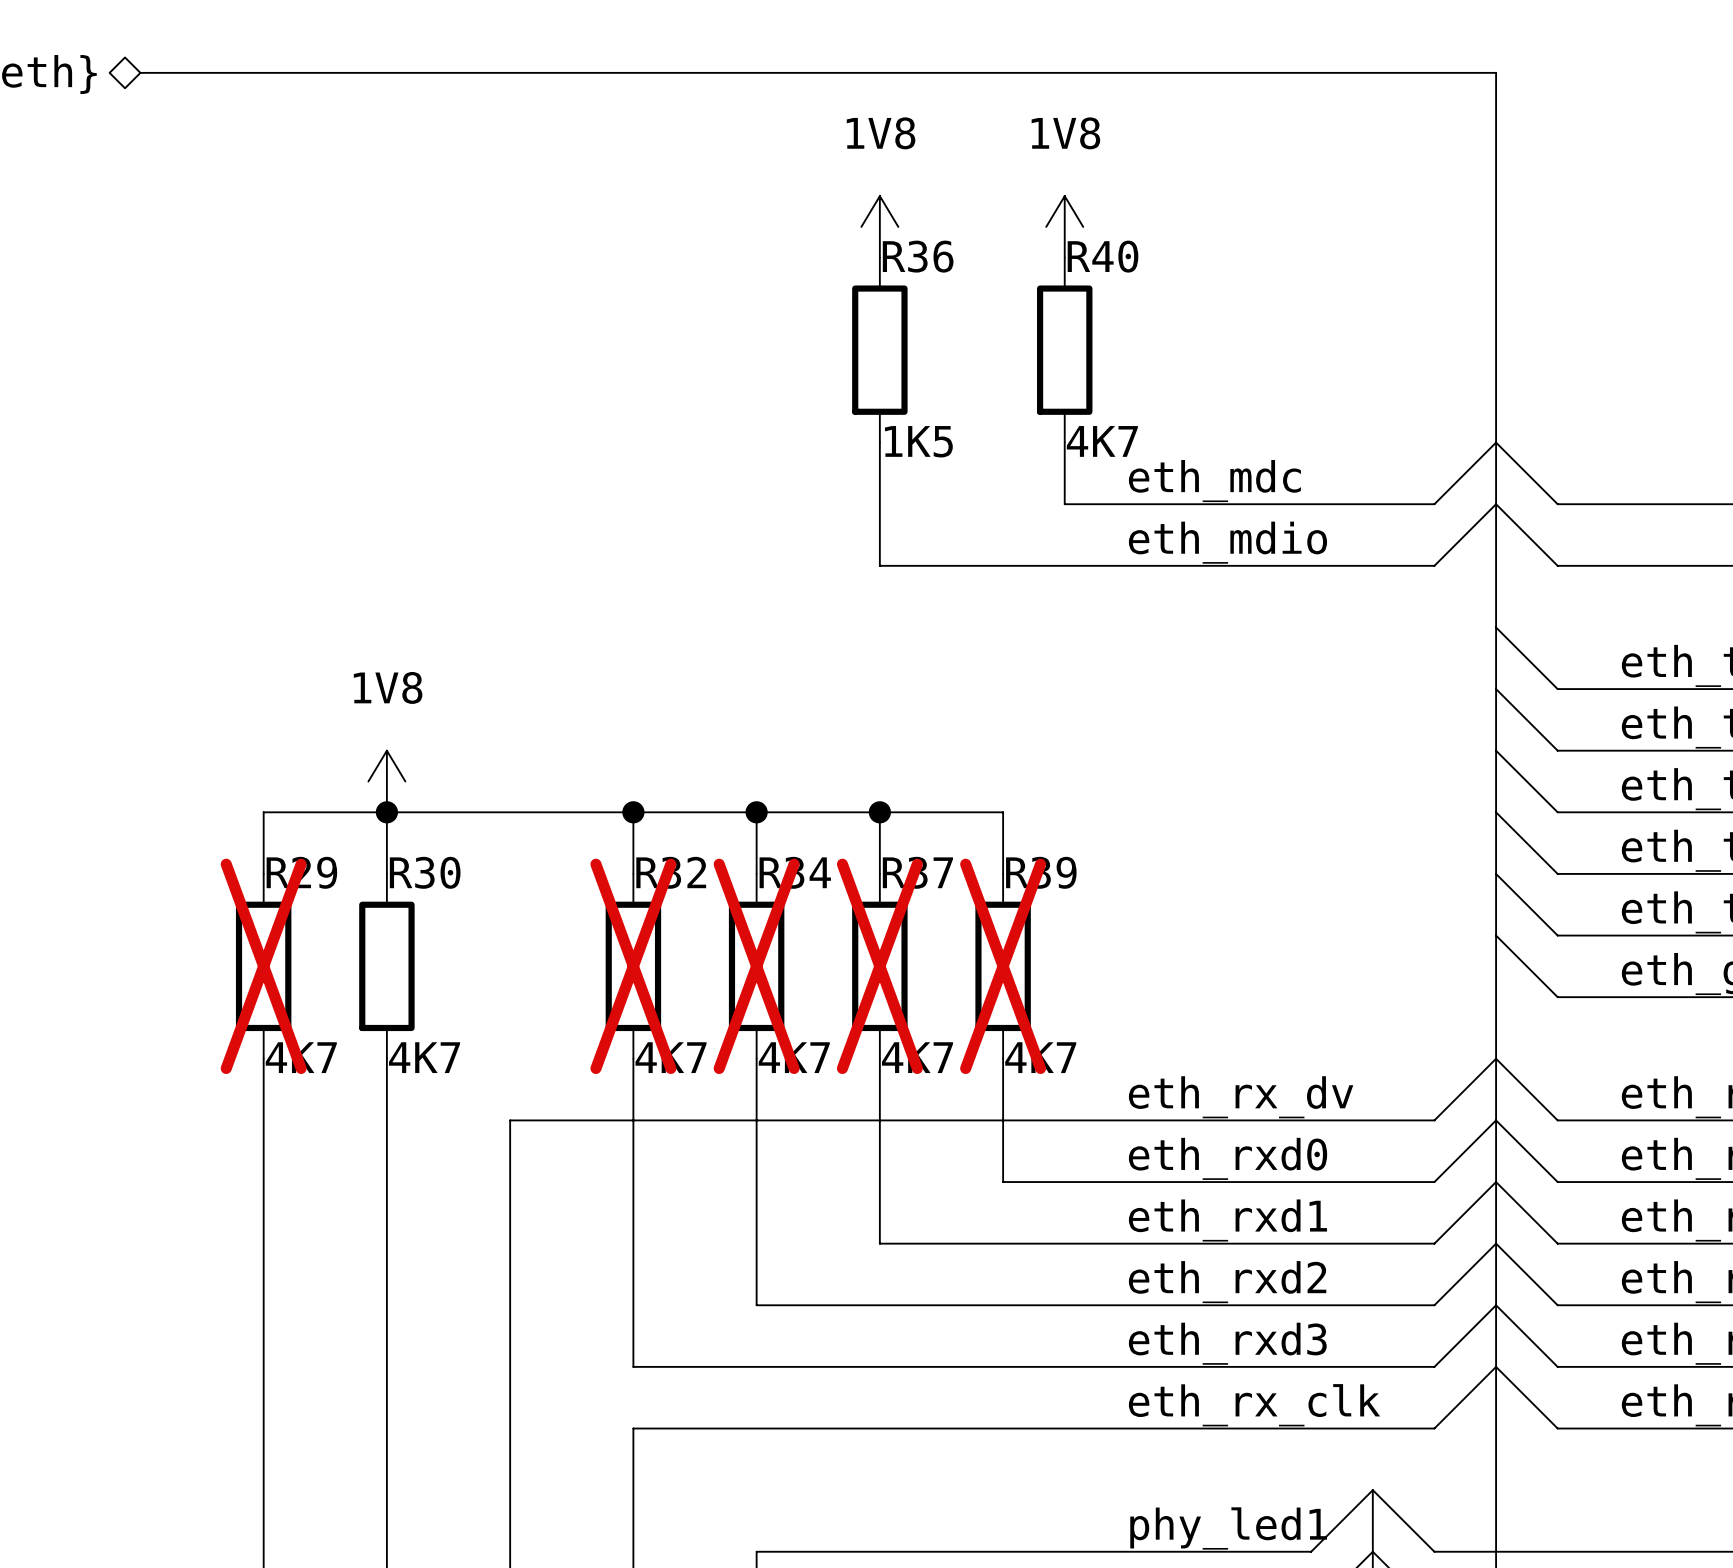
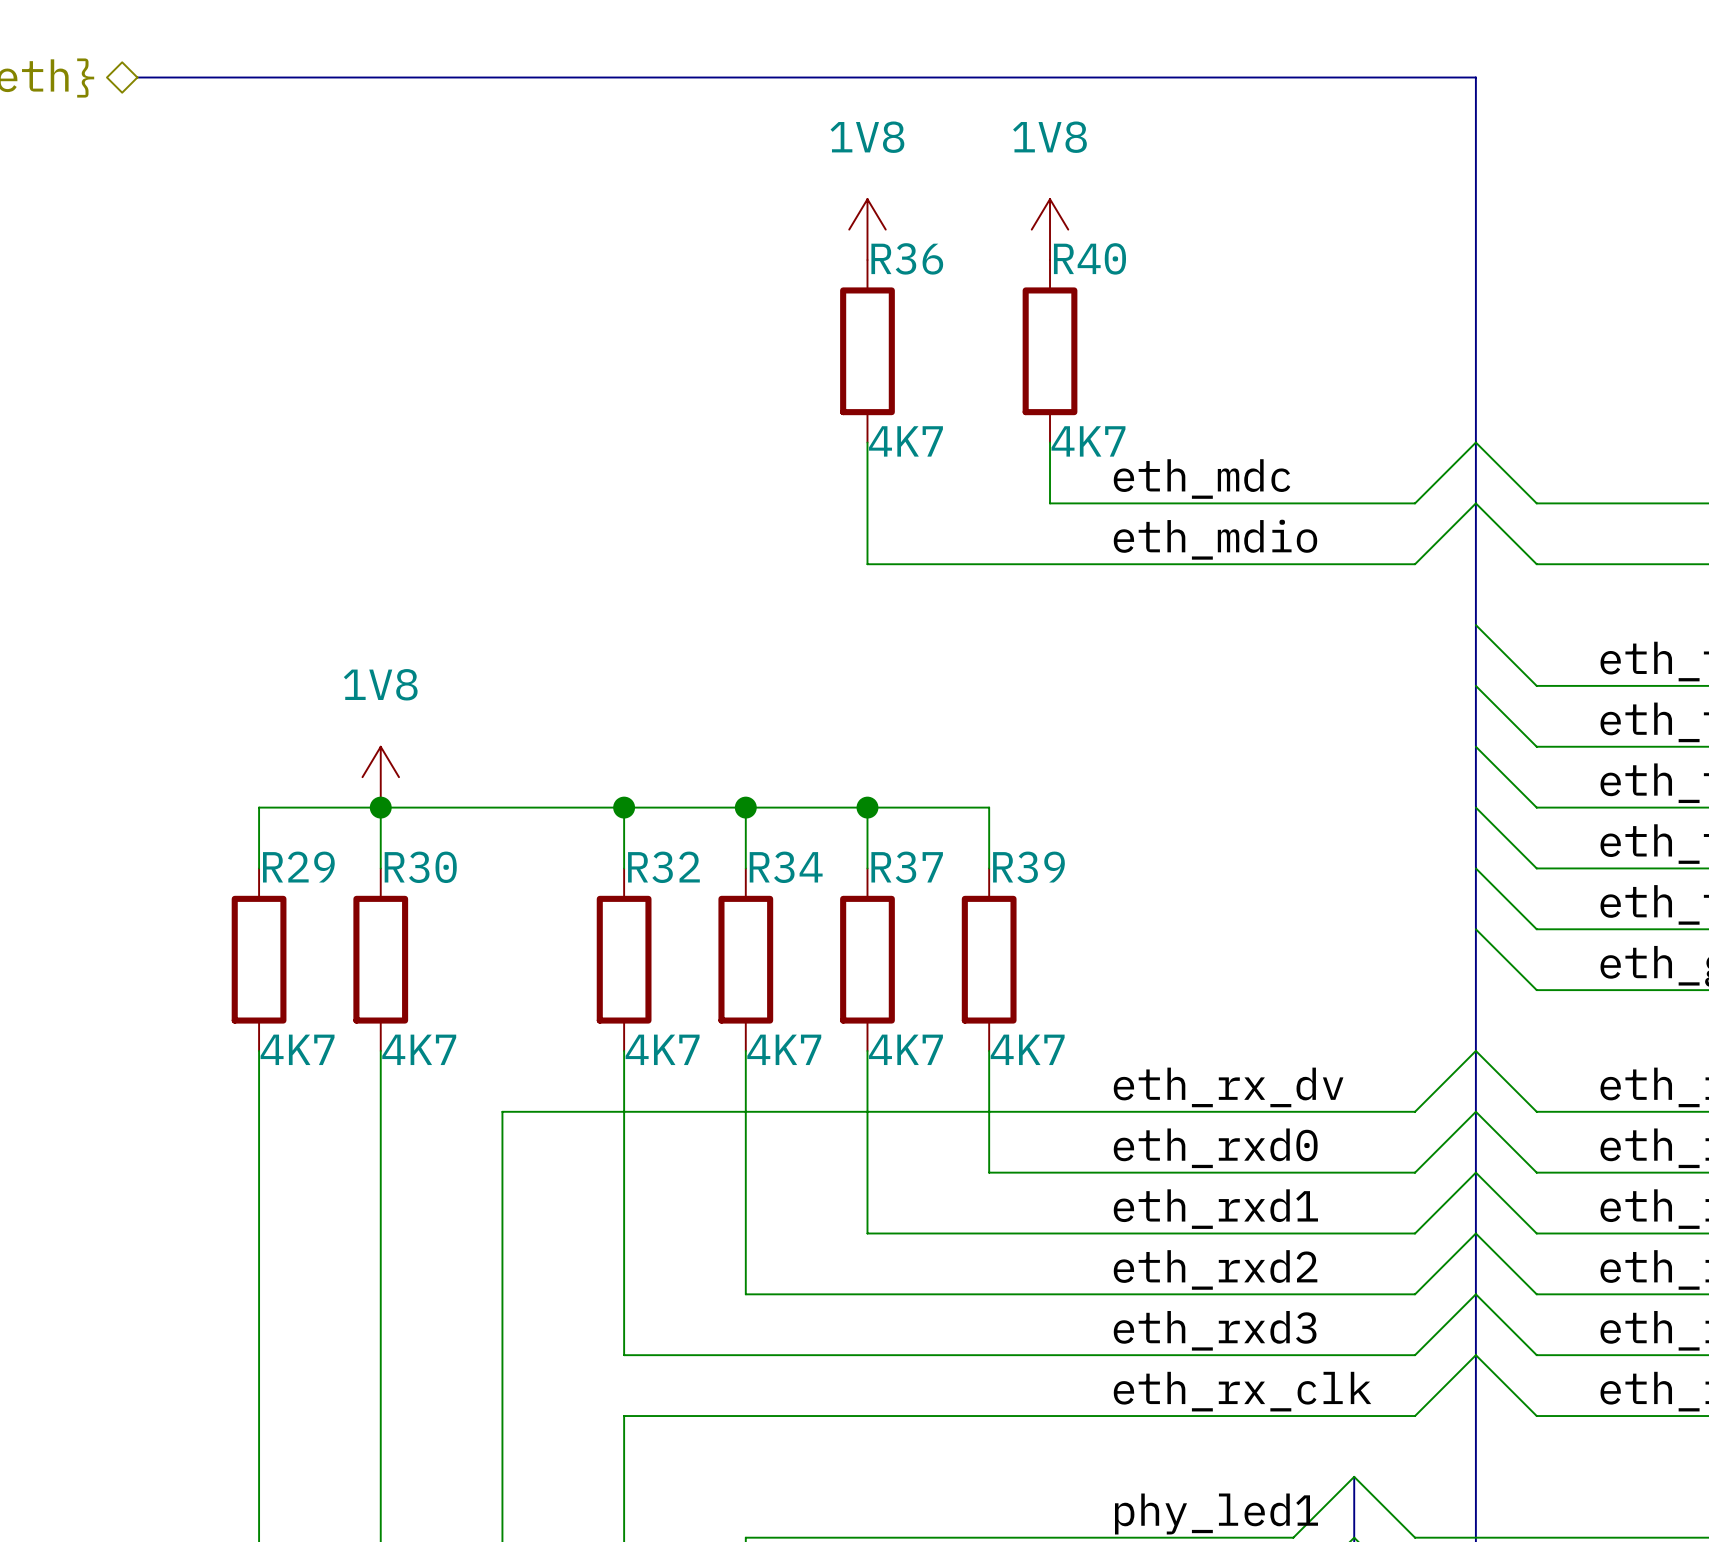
R36 value: 1K5 (918, 441) -> 4K7 (905, 441)
R29 do-not-place cross: (263, 966) -> none
R32 do-not-place cross: (633, 966) -> none
R34 do-not-place cross: (756, 966) -> none
R37 do-not-place cross: (879, 966) -> none
R39 do-not-place cross: (1003, 966) -> none

